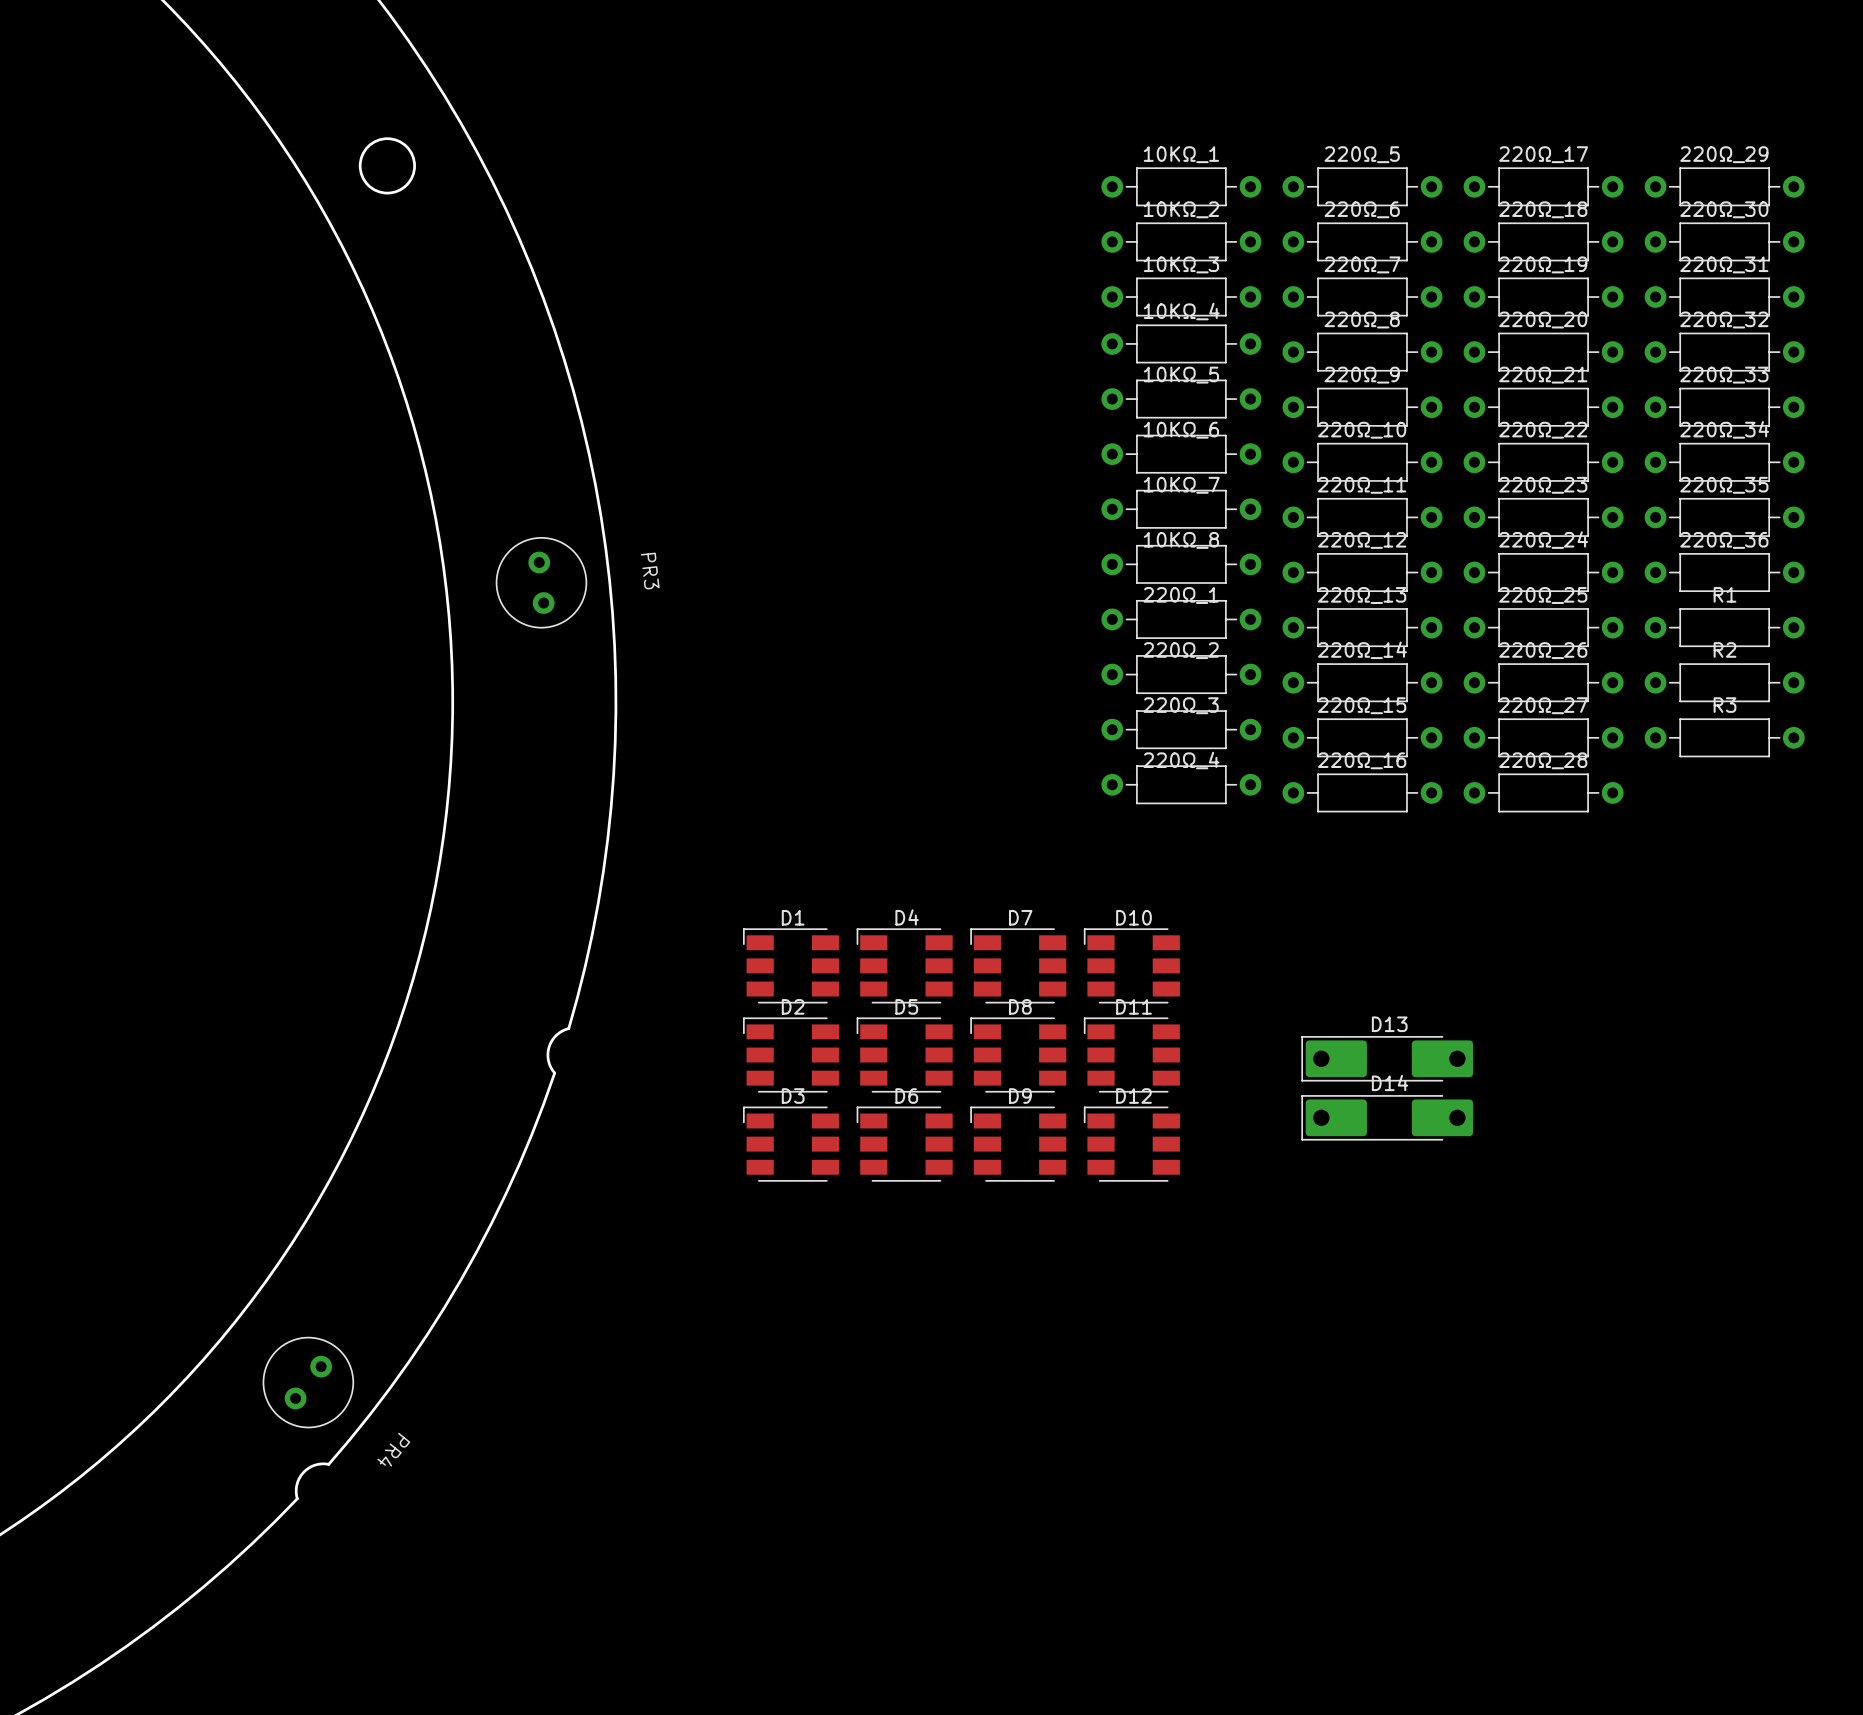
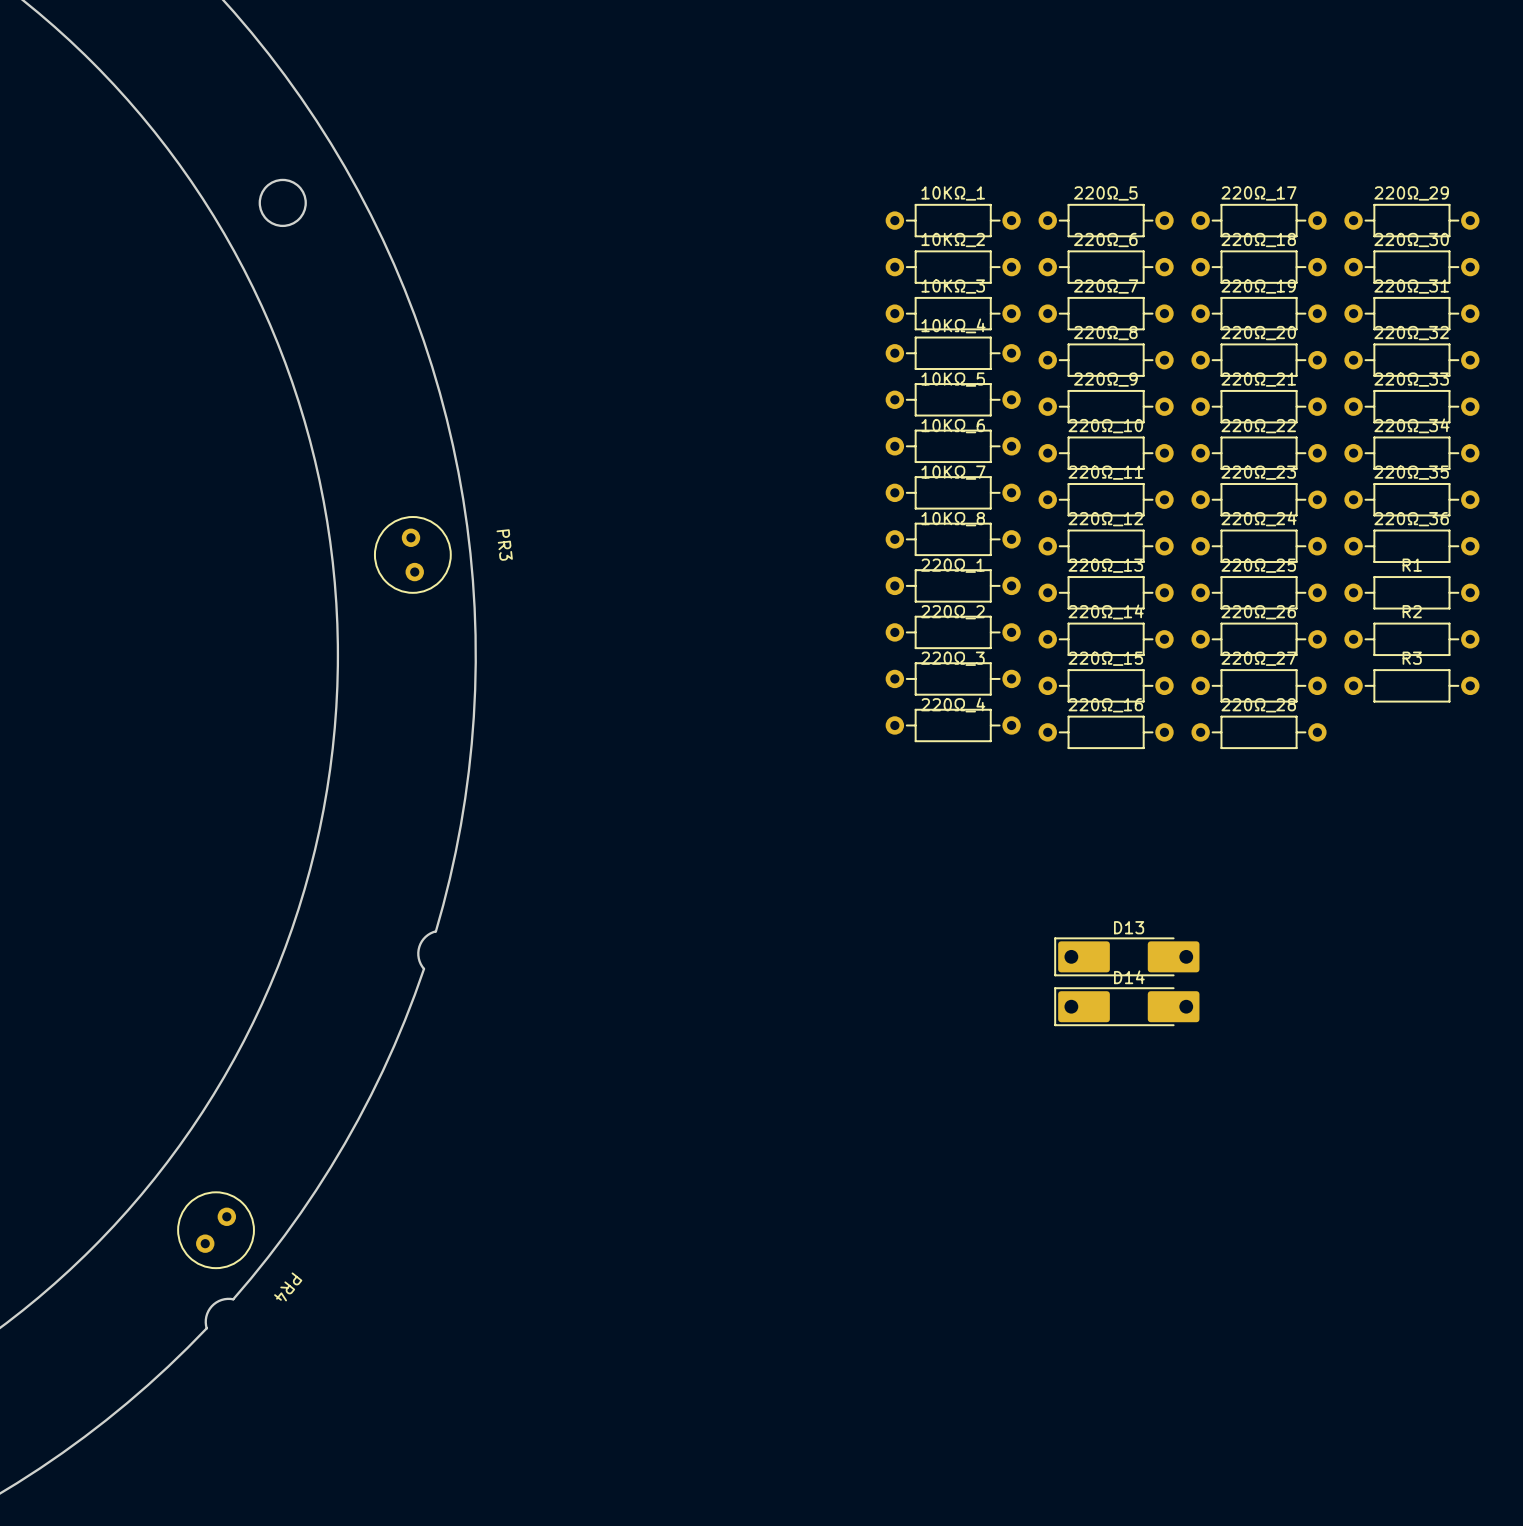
D1: (791, 965) -> none
D4: (904, 965) -> none
D7: (1018, 965) -> none
D10: (1131, 965) -> none
D2: (791, 1055) -> none
D5: (904, 1055) -> none
D8: (1018, 1055) -> none
D11: (1131, 1055) -> none
D3: (791, 1144) -> none
D6: (904, 1144) -> none
D9: (1018, 1144) -> none
D12: (1131, 1144) -> none

